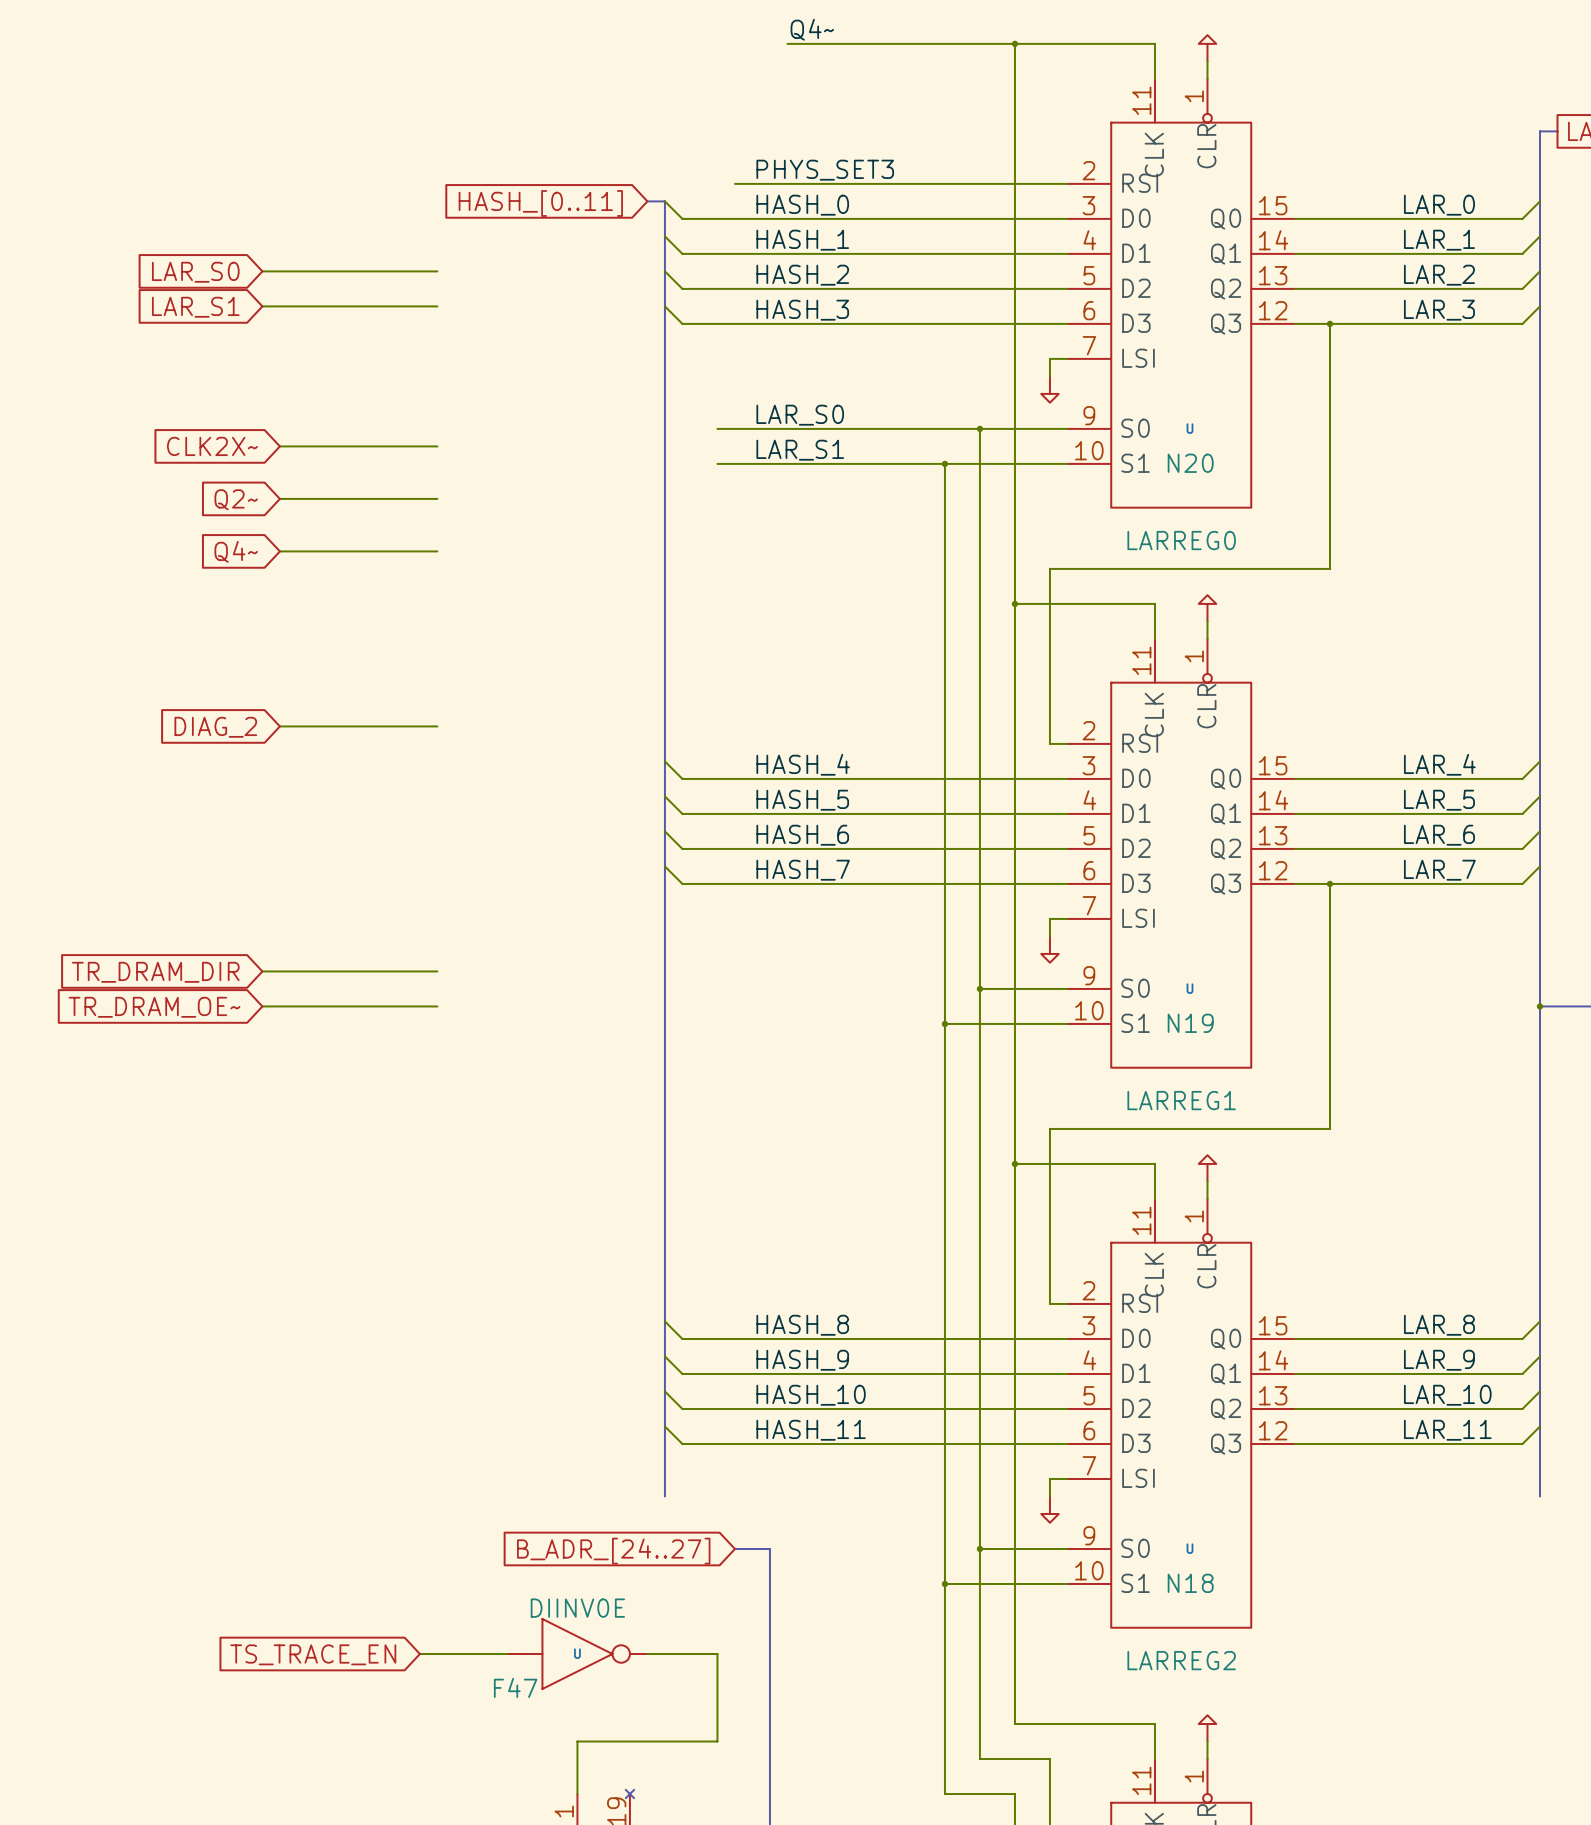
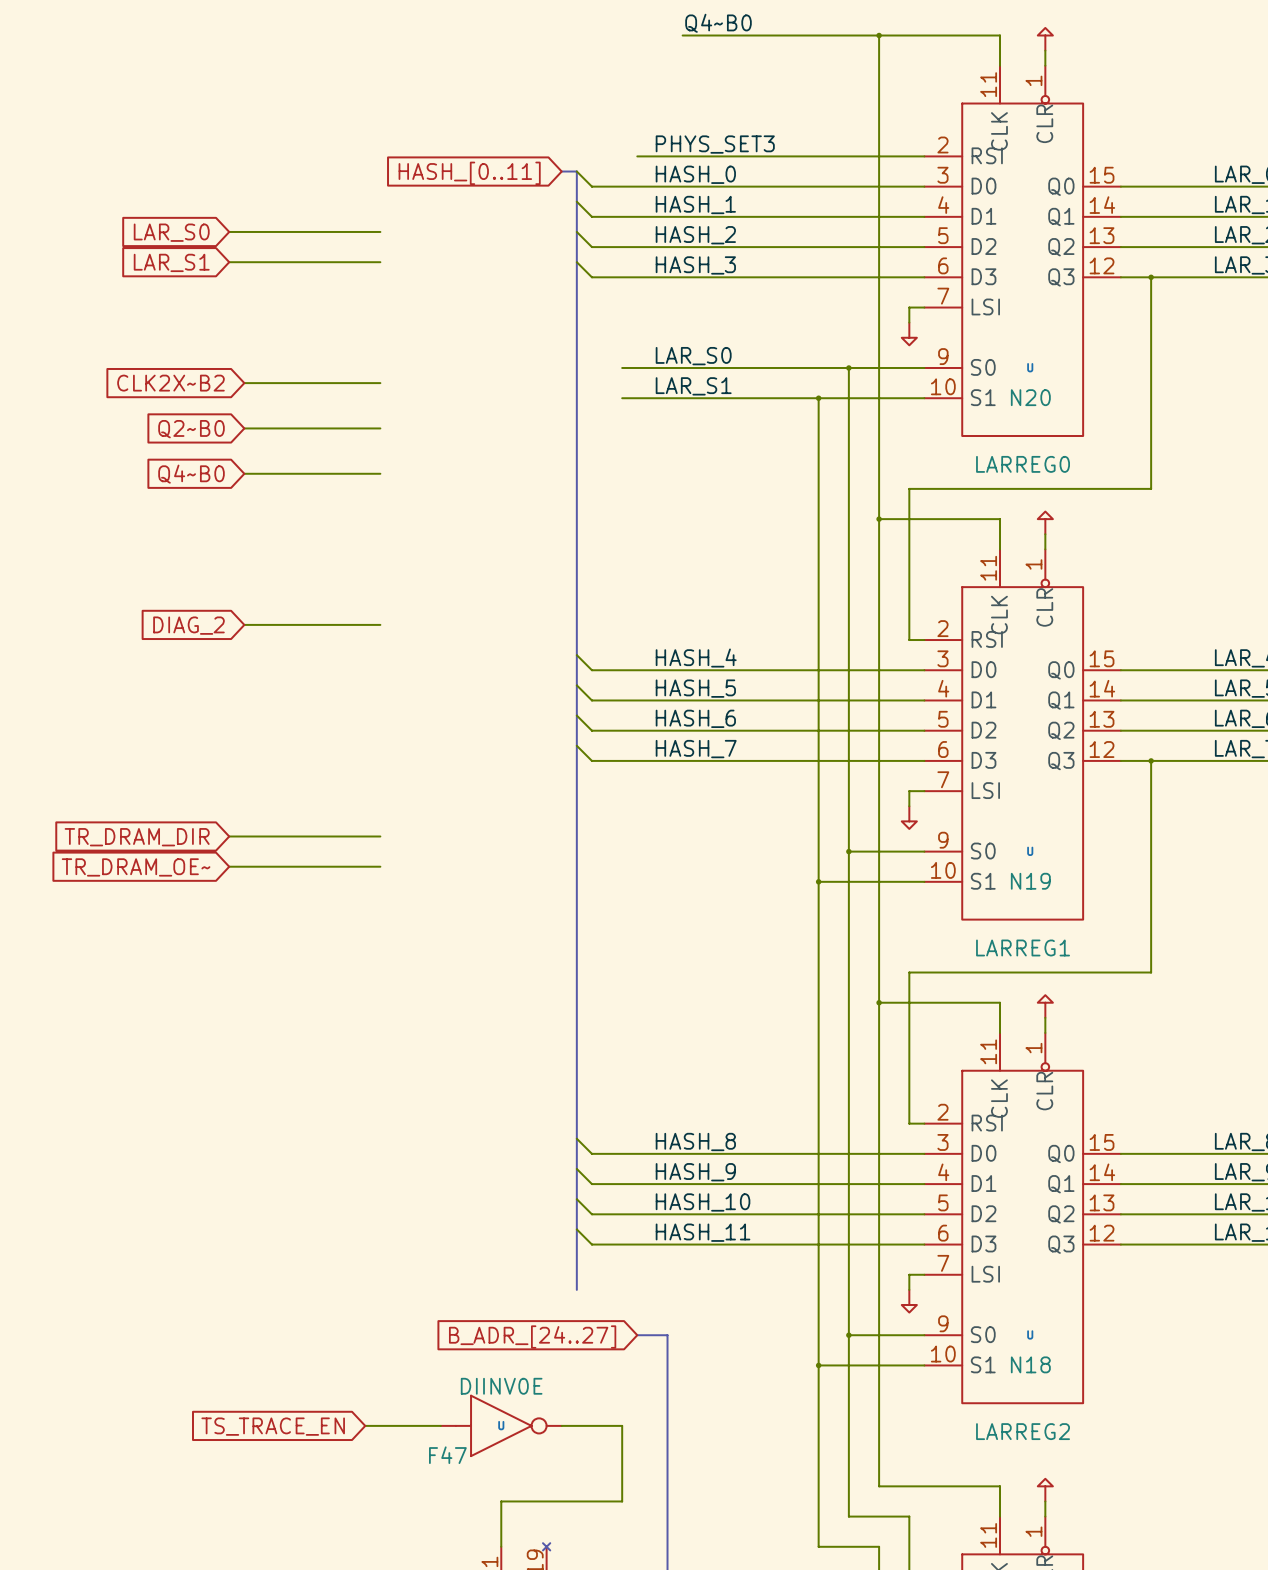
label: Q4~ (812, 29) -> Q4~B0 (718, 23)
global label: CLK2X~ (212, 446) -> CLK2X~B2 (170, 383)
global label: Q2~ (236, 499) -> Q2~B0 (191, 429)
global label: Q4~ (236, 551) -> Q4~B0 (191, 474)

